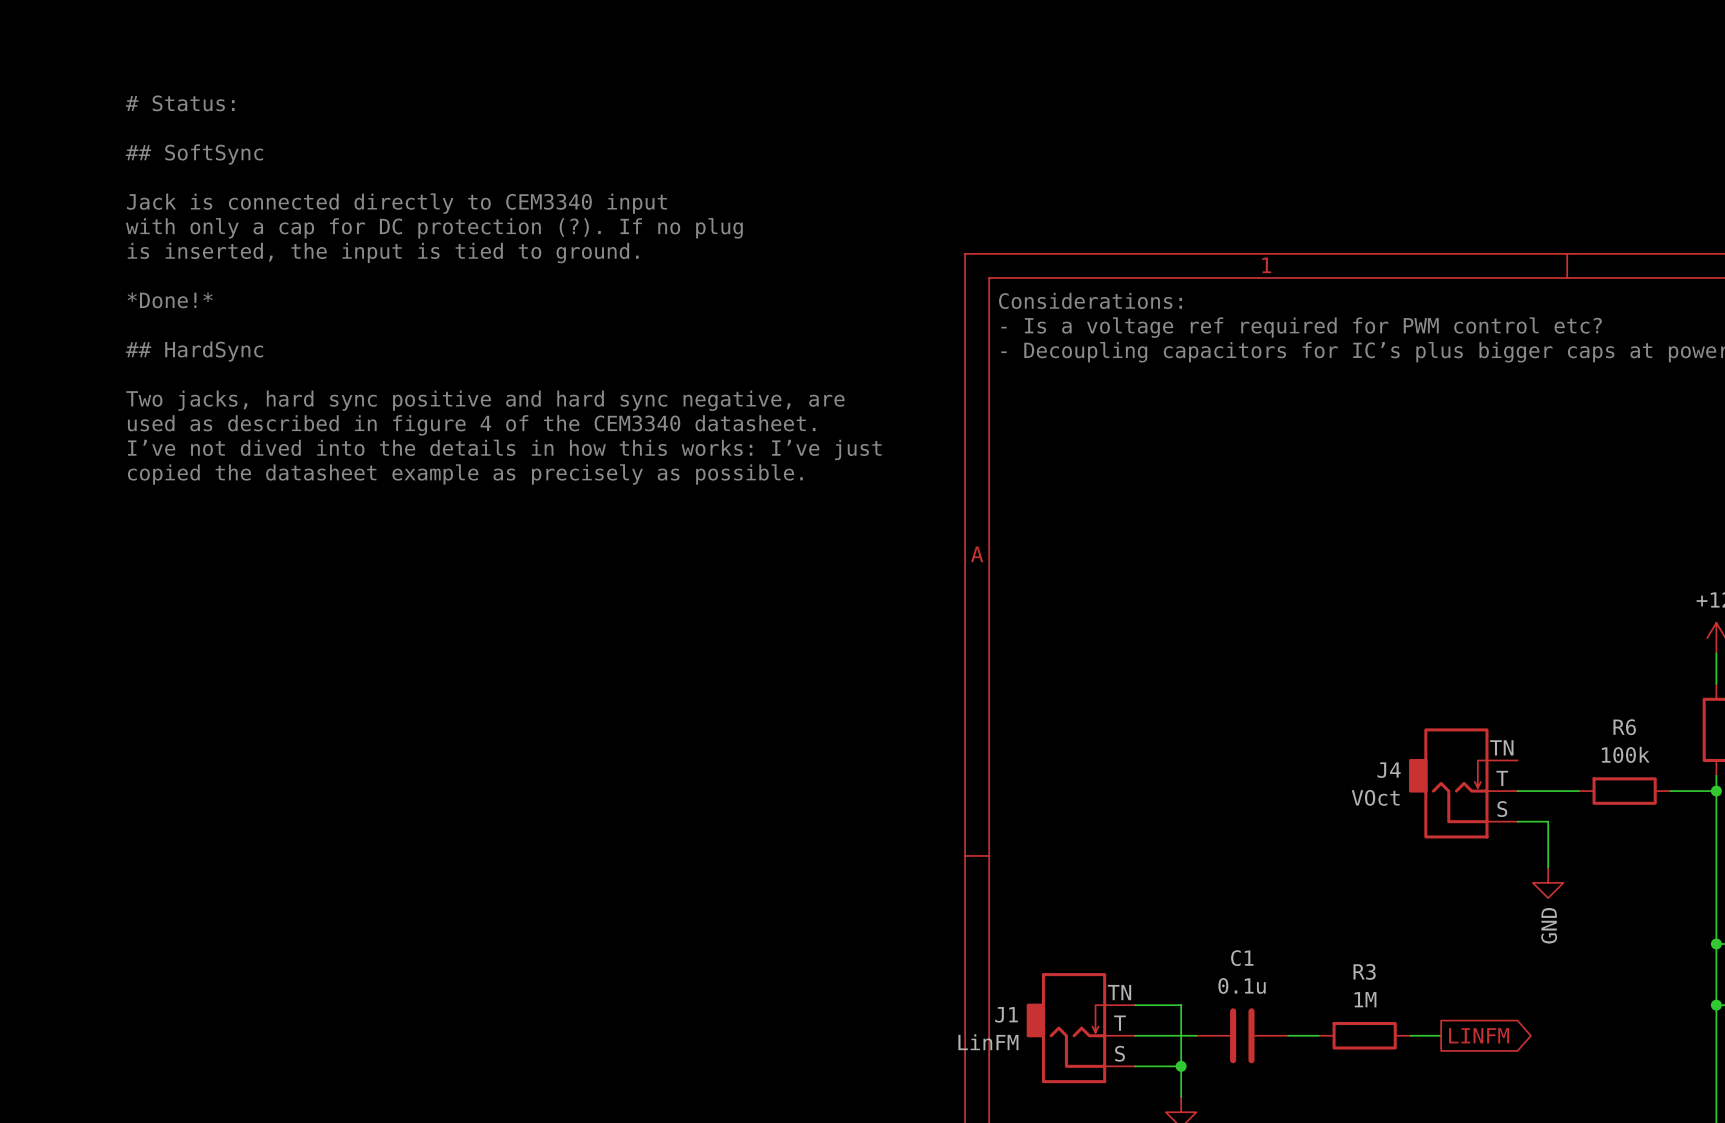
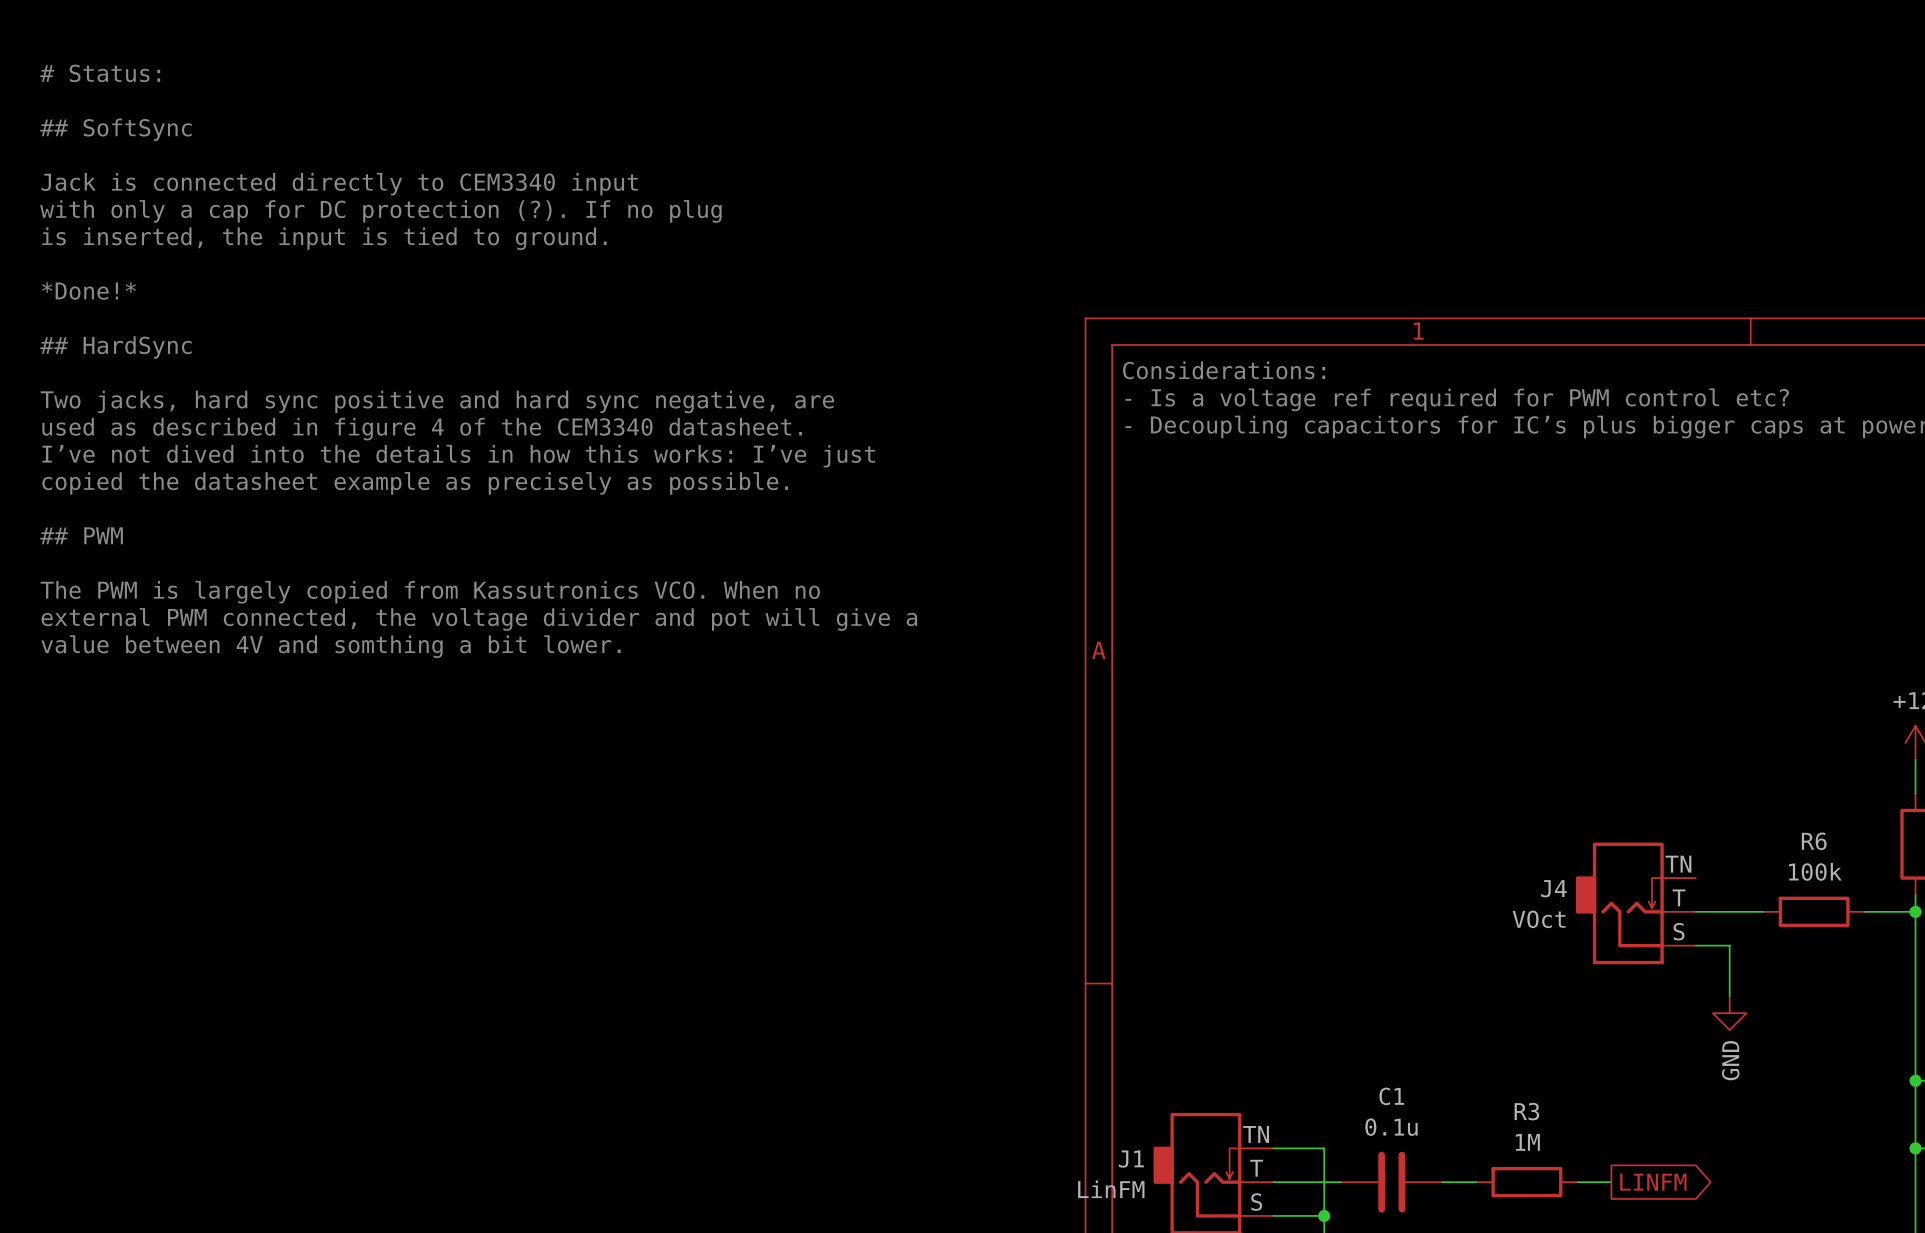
text position: # Status: (180, 103) -> # Status: (100, 73)
text position: ## SoftSync (194, 154) -> ## SoftSync (115, 129)
text position: Jack is connected directly to CEM3340 input (396, 203) -> Jack is connected directly to CEM3340 input (339, 184)
text position: with only a cap for DC protection (?). If no plug (434, 228) -> with only a cap for DC protection (?). If no plug (380, 211)
text position: is inserted, the input is tied to ground. (383, 253) -> is inserted, the input is tied to ground. (324, 238)
text position: *Done!* (170, 300) -> *Done!* (89, 290)
text position: ## HardSync (194, 351) -> ## HardSync (115, 347)
text position: Two jacks, hard sync positive and hard sync negative, are (485, 400) -> Two jacks, hard sync positive and hard sync negative, are (437, 401)
text position: used as described in figure 4 of the CEM3340 datasheet. (471, 425) -> used as described in figure 4 of the CEM3340 datasheet. (422, 429)
text position: I’ve not dived into the details in how this works: I’ve just (504, 449) -> I’ve not dived into the details in how this works: I’ve just (458, 456)
text: none -> ## PWM (81, 535)
text position: copied the datasheet example as precisely as possible. (465, 474) -> copied the datasheet example as precisely as possible. (415, 483)
text: none -> The PWM is largely copied from Kassutronics VCO. When no (430, 592)
text: none -> external PWM connected, the voltage divider and pot will give a (479, 619)
text: none -> value between 4V and somthing a bit lower. (330, 646)

